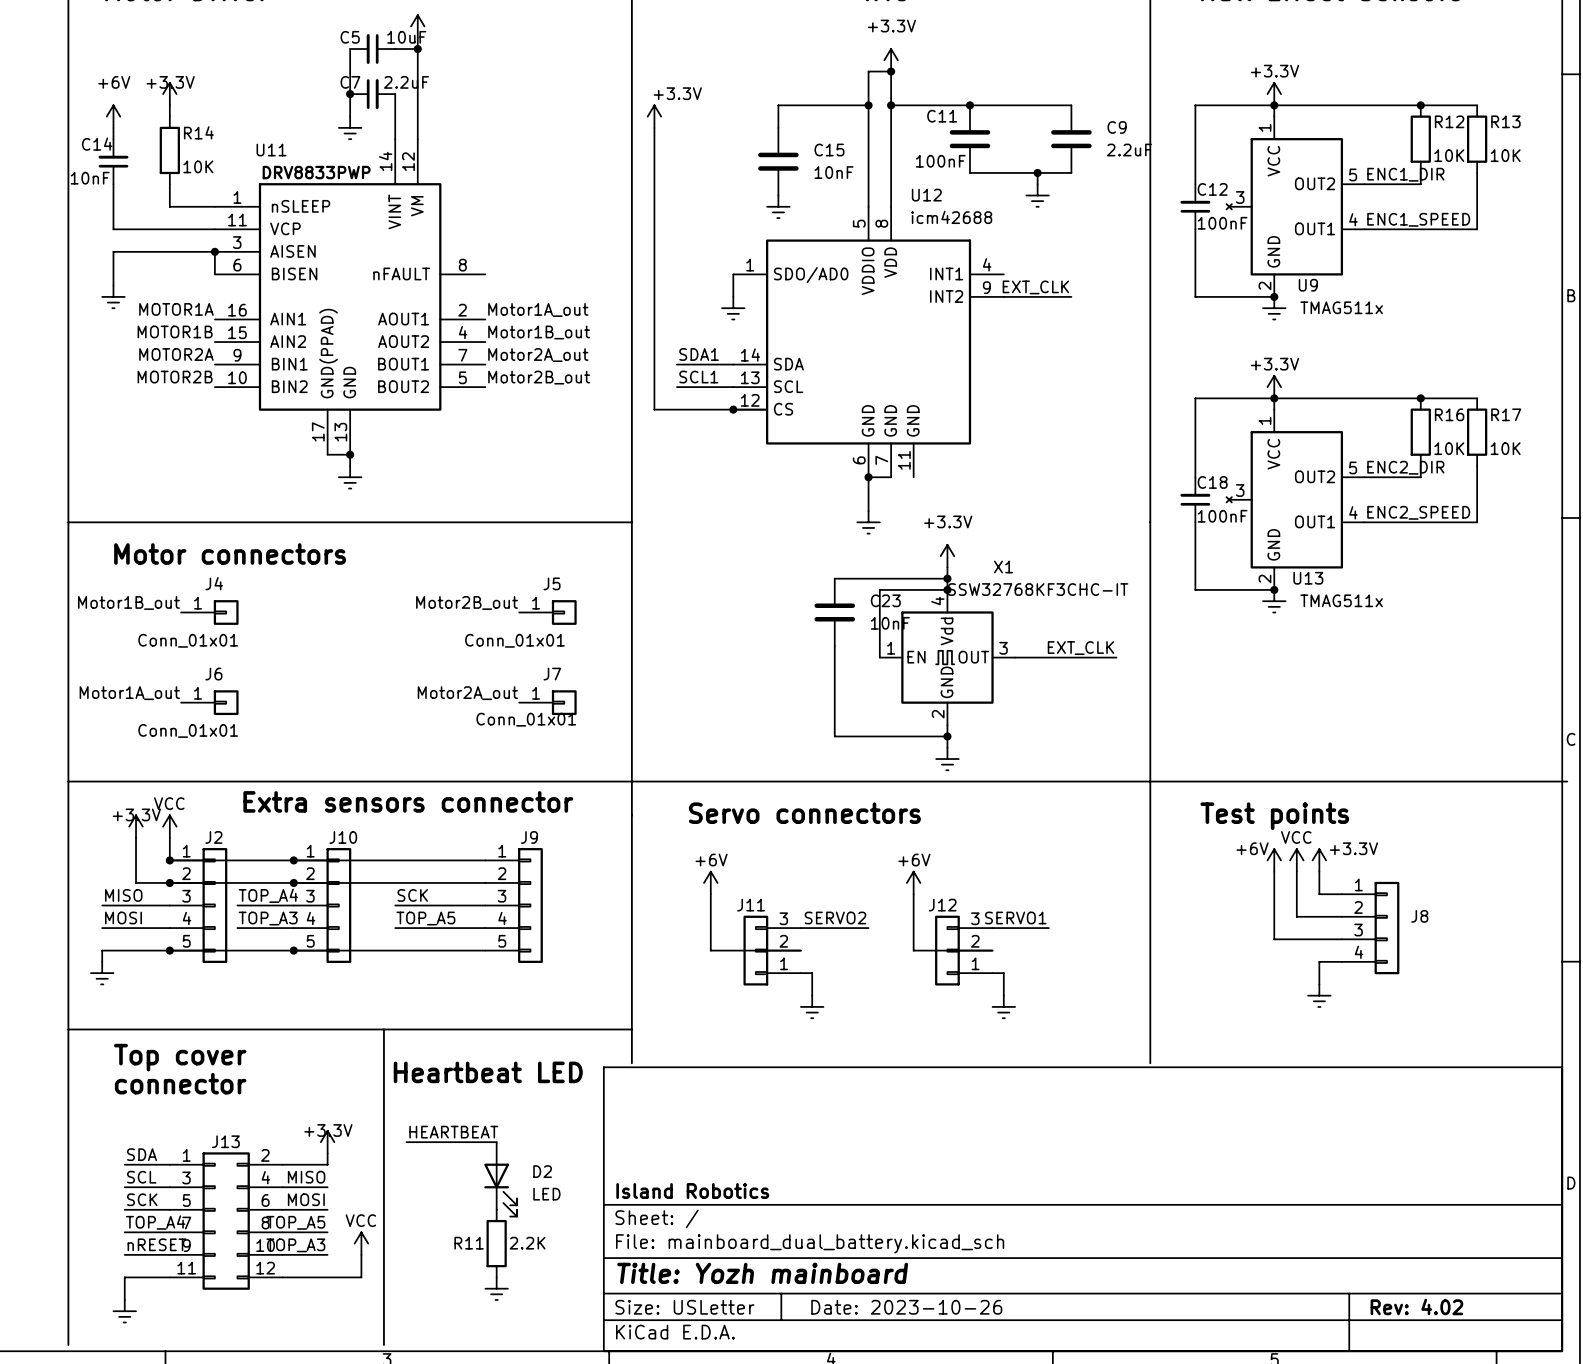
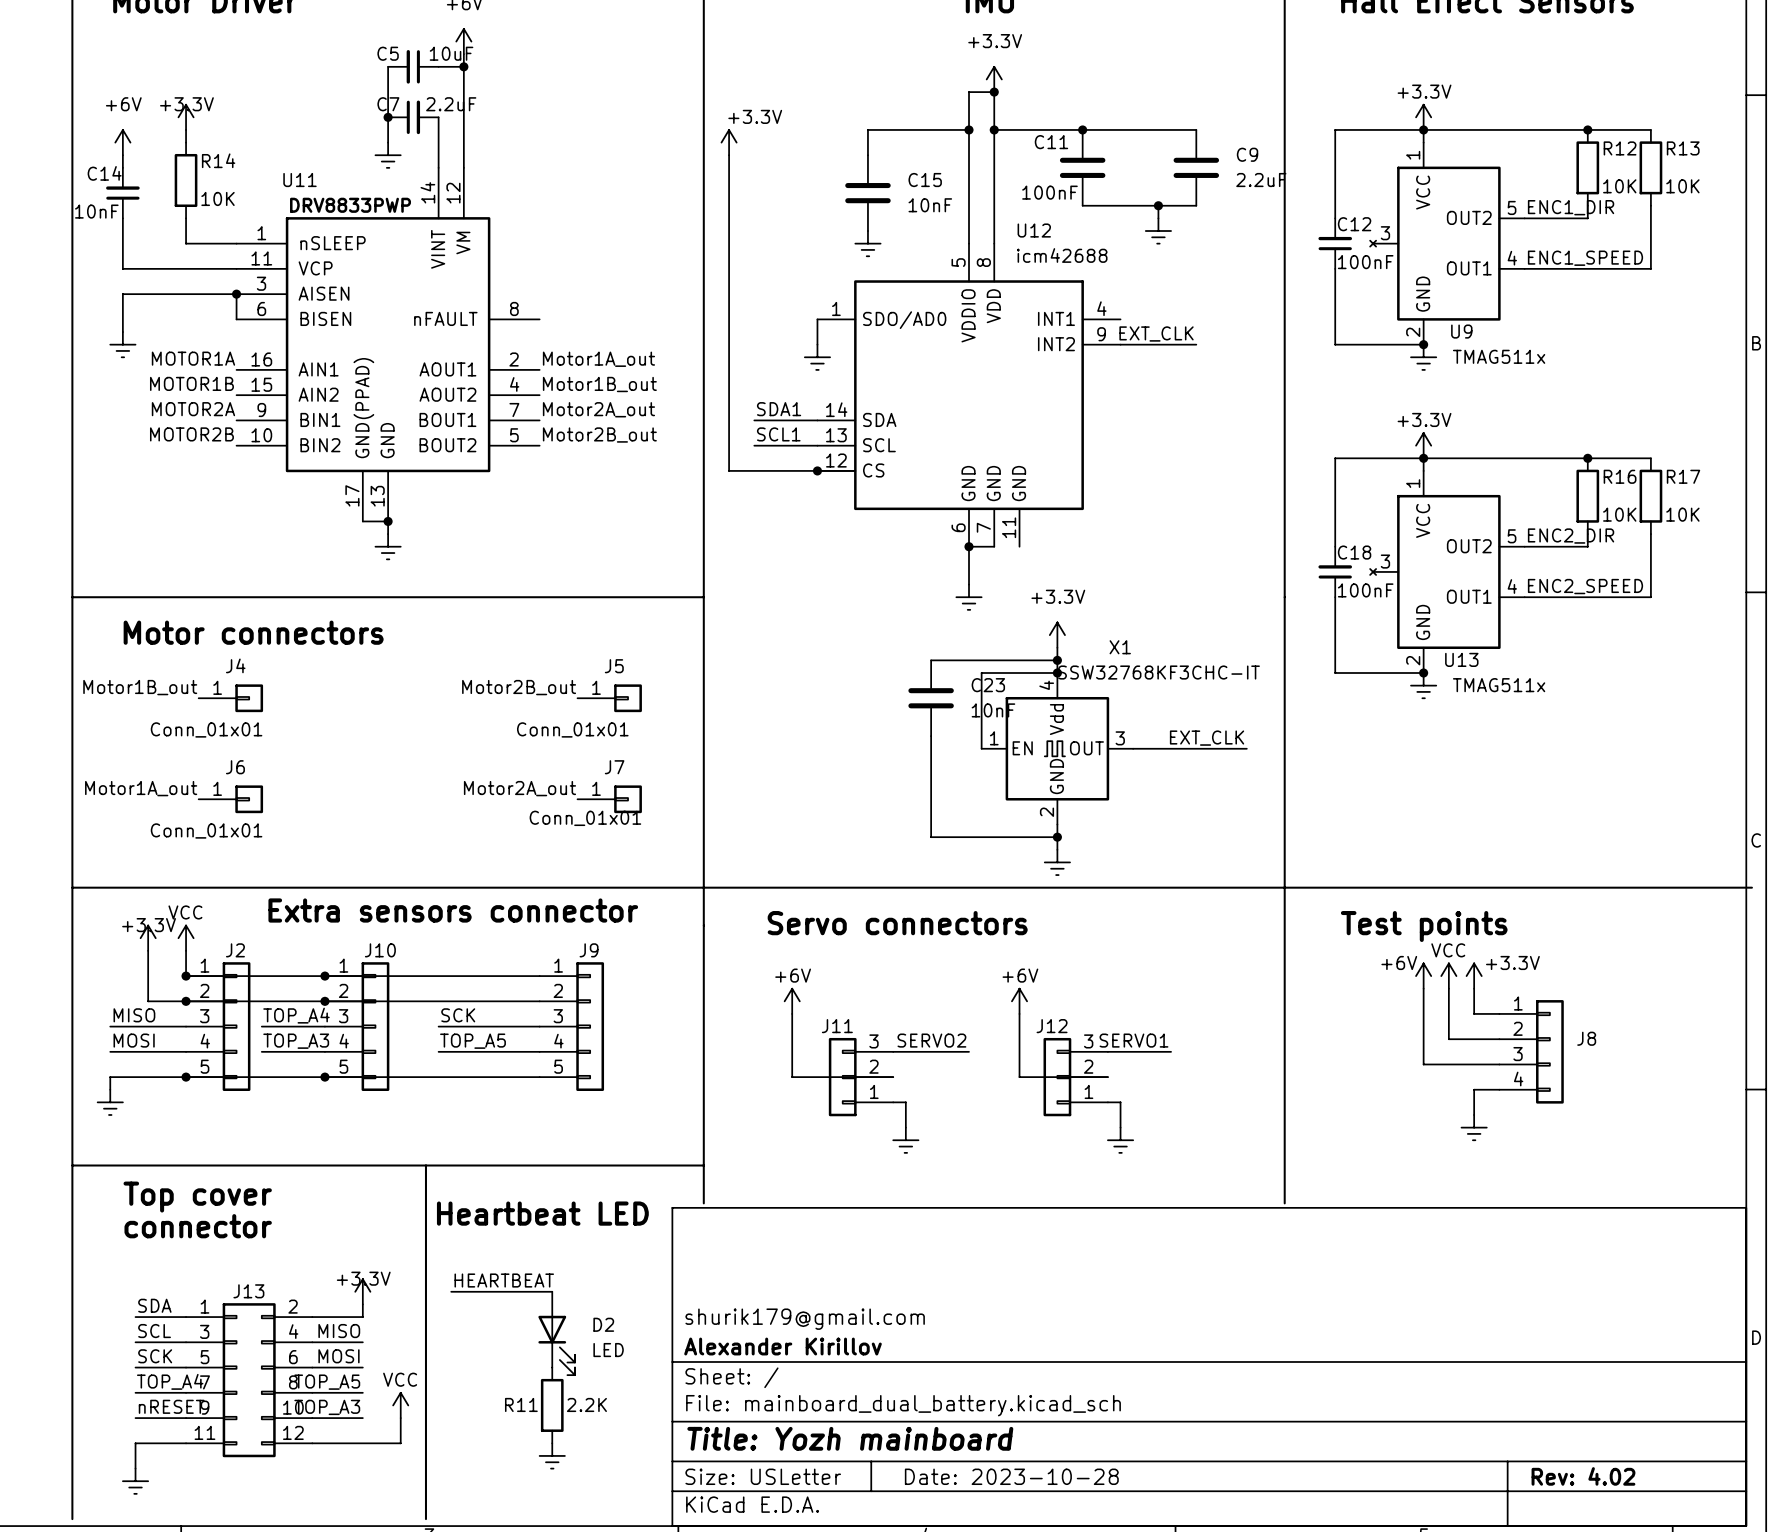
title block: none -> shurik179@gmail.com (805, 1319)
title block: Island Robotics (692, 1191) -> Alexander Kirillov (783, 1346)
title block: Date: 2023-10-26 (906, 1307) -> Date: 2023-10-28 (1011, 1476)

